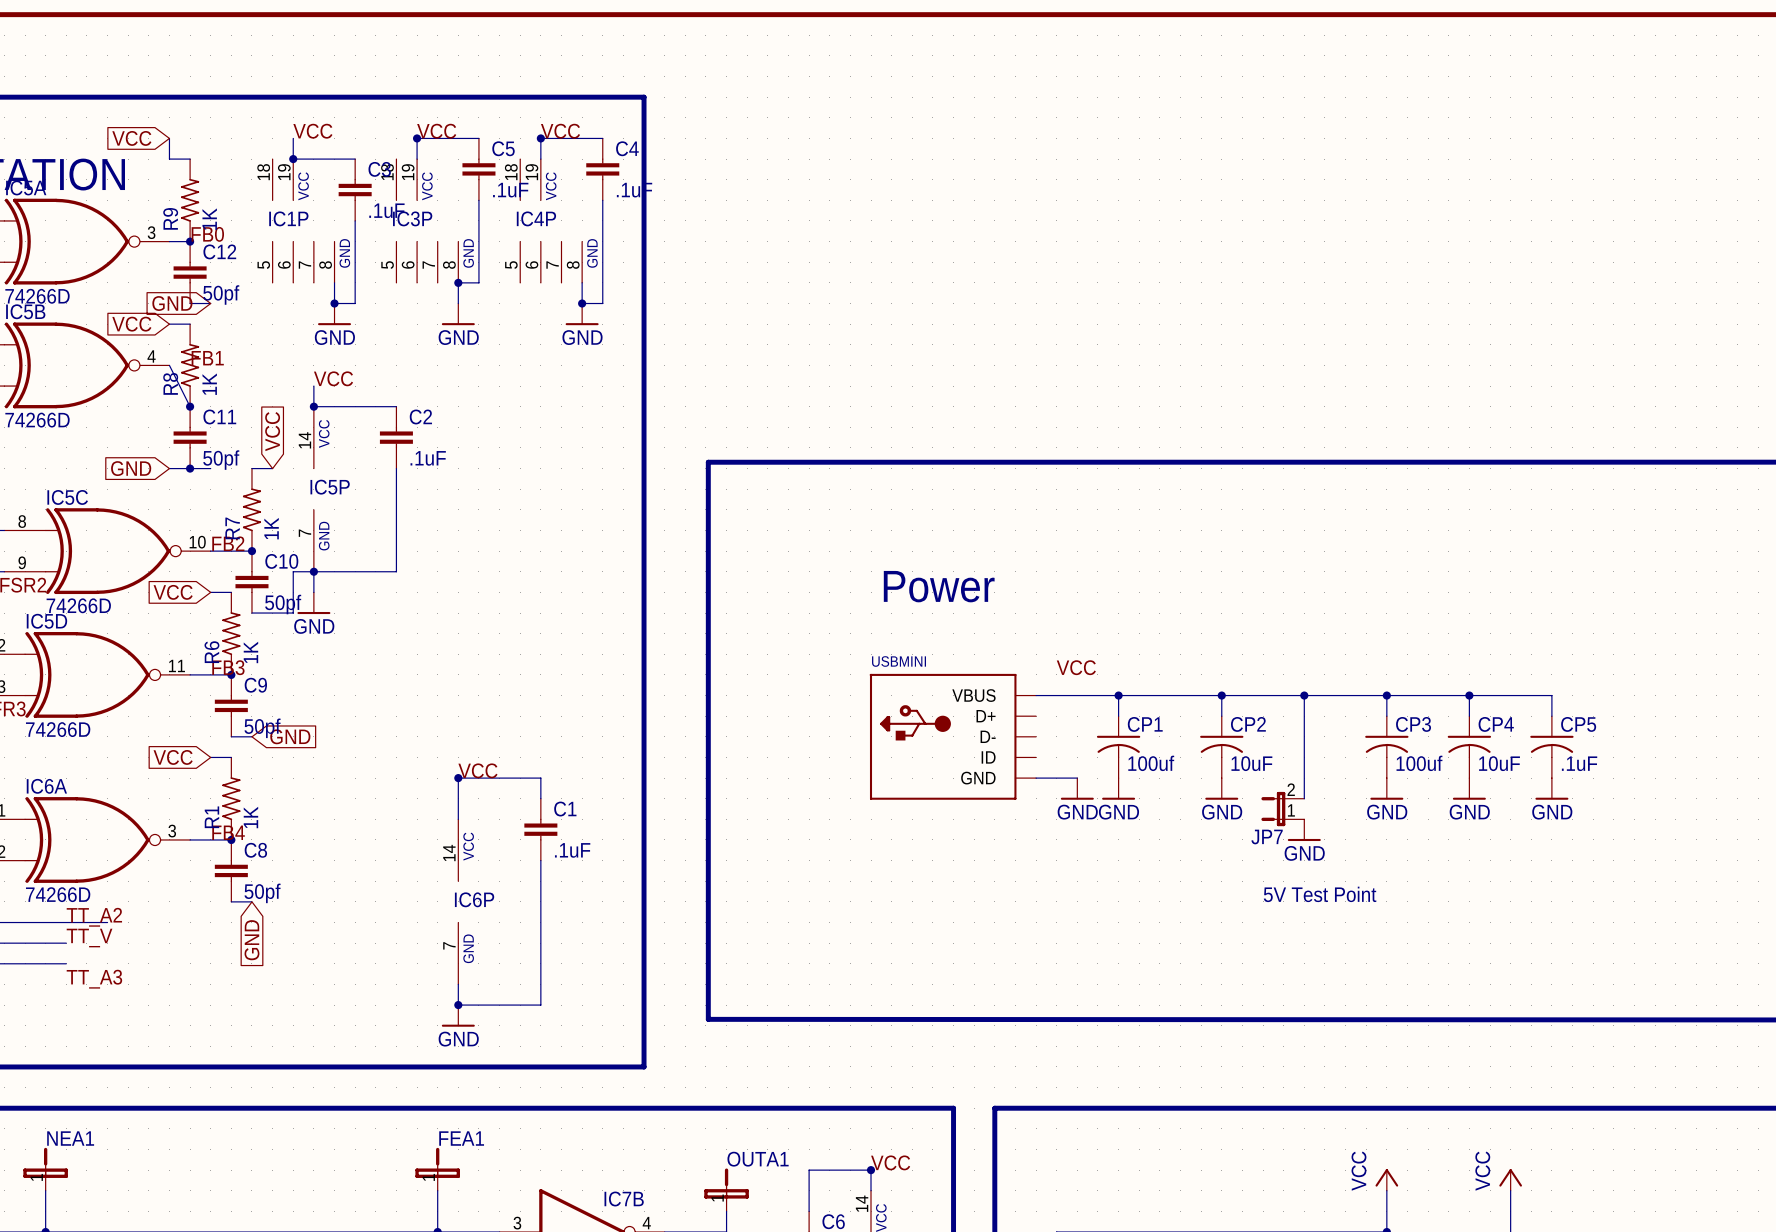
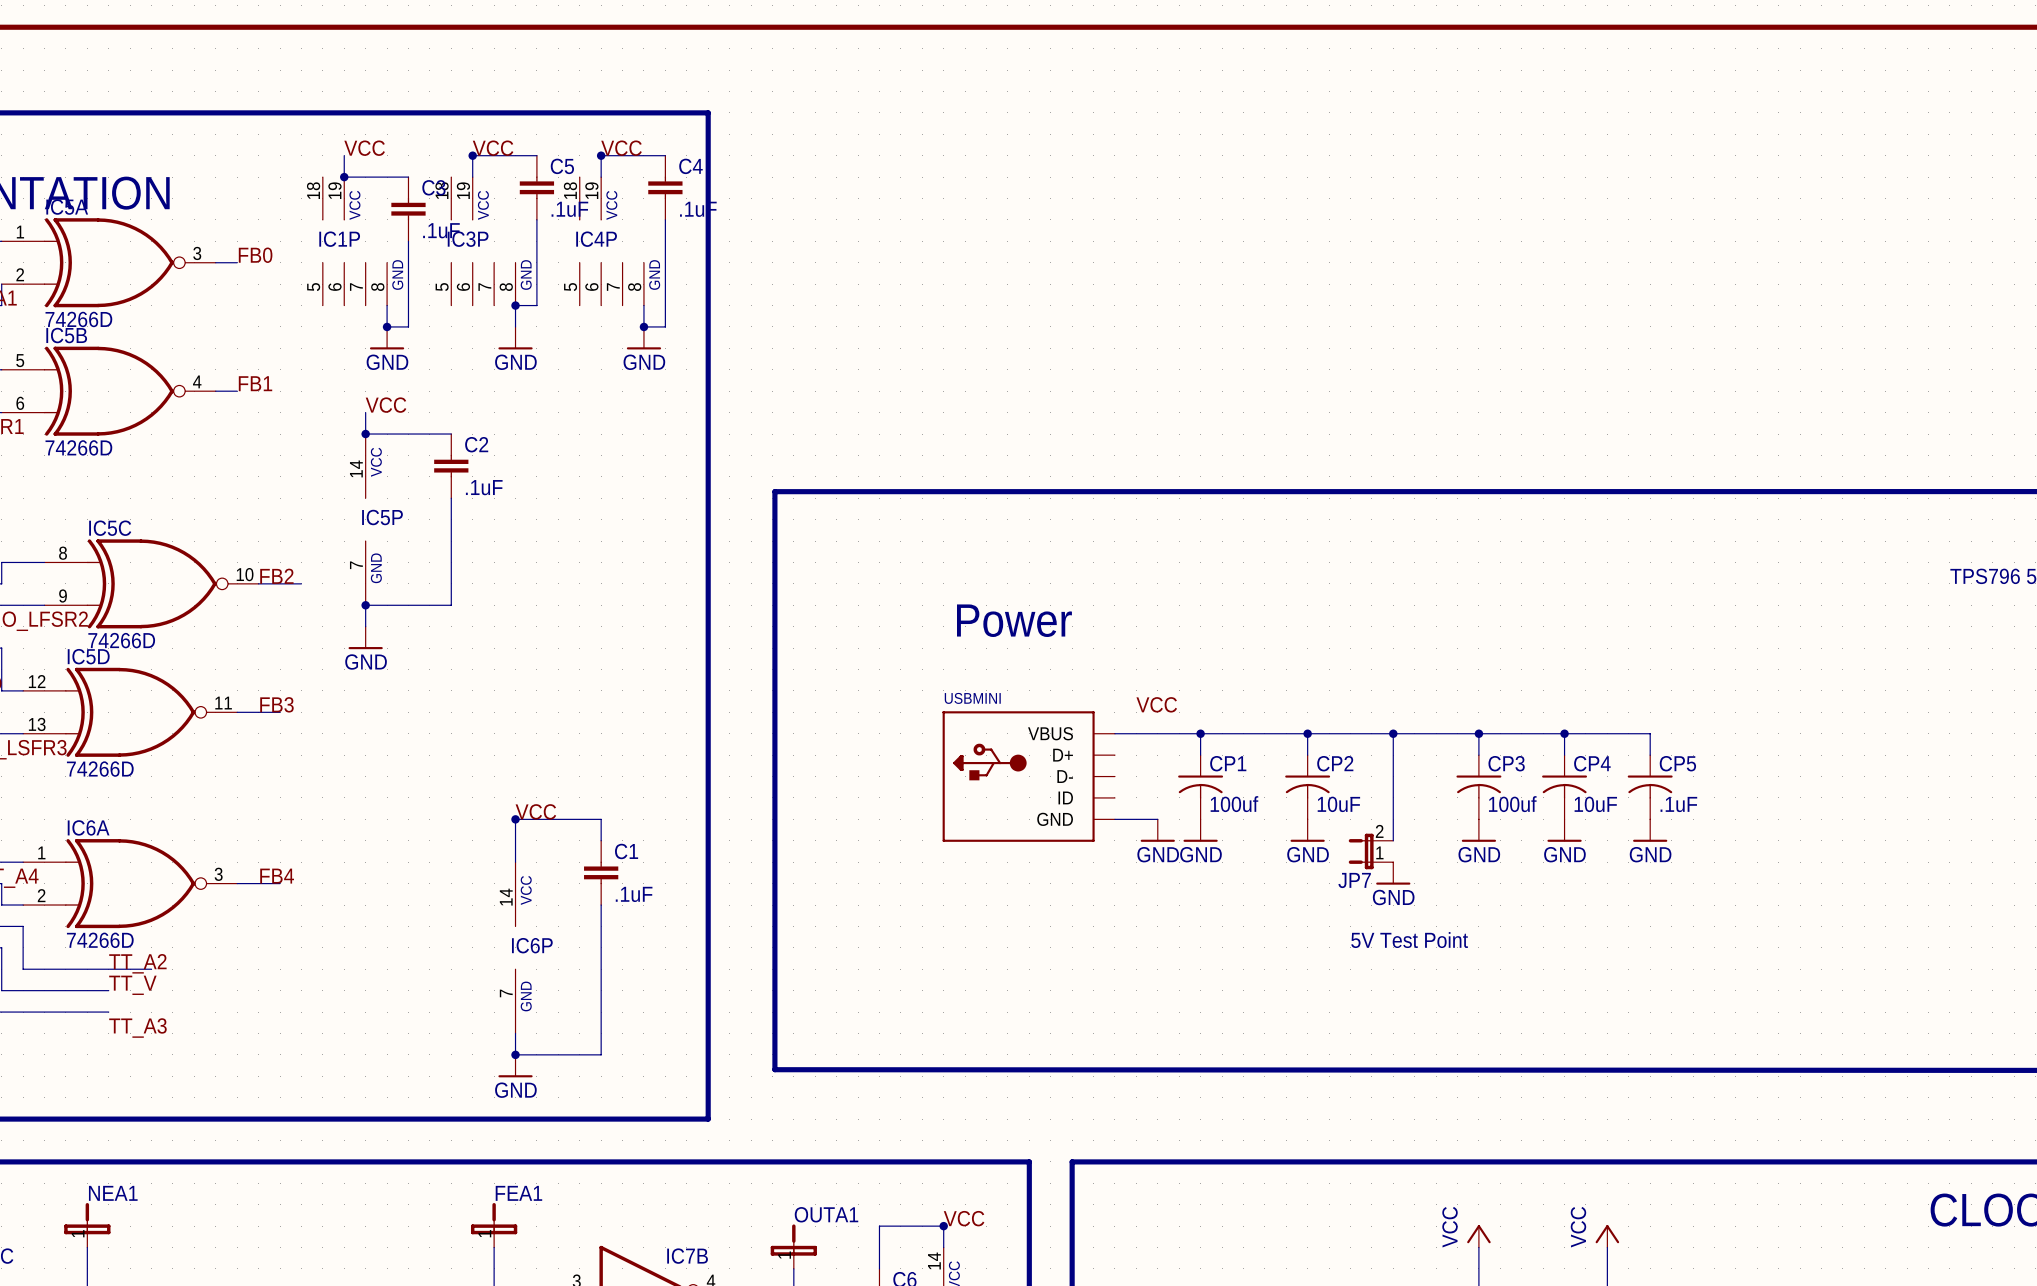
global label: VCC (131, 138) -> none
wire: (169, 138) (169, 159) (190, 159) -> none
R9: 1K (190, 200) -> none
junction: (190, 241) -> none
C12: 50pf (190, 272) -> none
global label: GND (172, 303) -> none
wire: (190, 303) (210, 303) -> none
global label: VCC (131, 324) -> none
wire: (169, 324) (190, 324) -> none
wire: (169, 365) (190, 406) -> (215, 391) (237, 391)
R8: 1K (190, 365) -> none
junction: (190, 406) -> none
global label: VCC (272, 431) -> none
C11: 50pf (190, 437) -> none
global label: GND (131, 468) -> none
wire: (169, 468) (210, 468) -> none
junction: (190, 468) -> none
wire: (251, 468) (272, 468) -> none
R7: 1K (251, 509) -> none
junction: (251, 551) -> none
wire: (313, 571) (293, 571) (293, 613) (251, 613) -> none
C10: 50pf (251, 582) -> none
global label: VCC (173, 592) -> none
wire: (210, 592) (231, 592) -> none
R6: 1K (231, 633) -> none
junction: (231, 674) -> none
C9: 50pf (231, 705) -> none
wire: (231, 736) (251, 736) -> none
global label: GND (290, 736) -> none
global label: VCC (173, 757) -> none
wire: (210, 757) (231, 757) -> none
R1: 1K (231, 798) -> none
junction: (231, 839) -> none
C8: 50pf (231, 870) -> none
wire: (231, 901) (251, 901) -> none
global label: GND (251, 940) -> none

